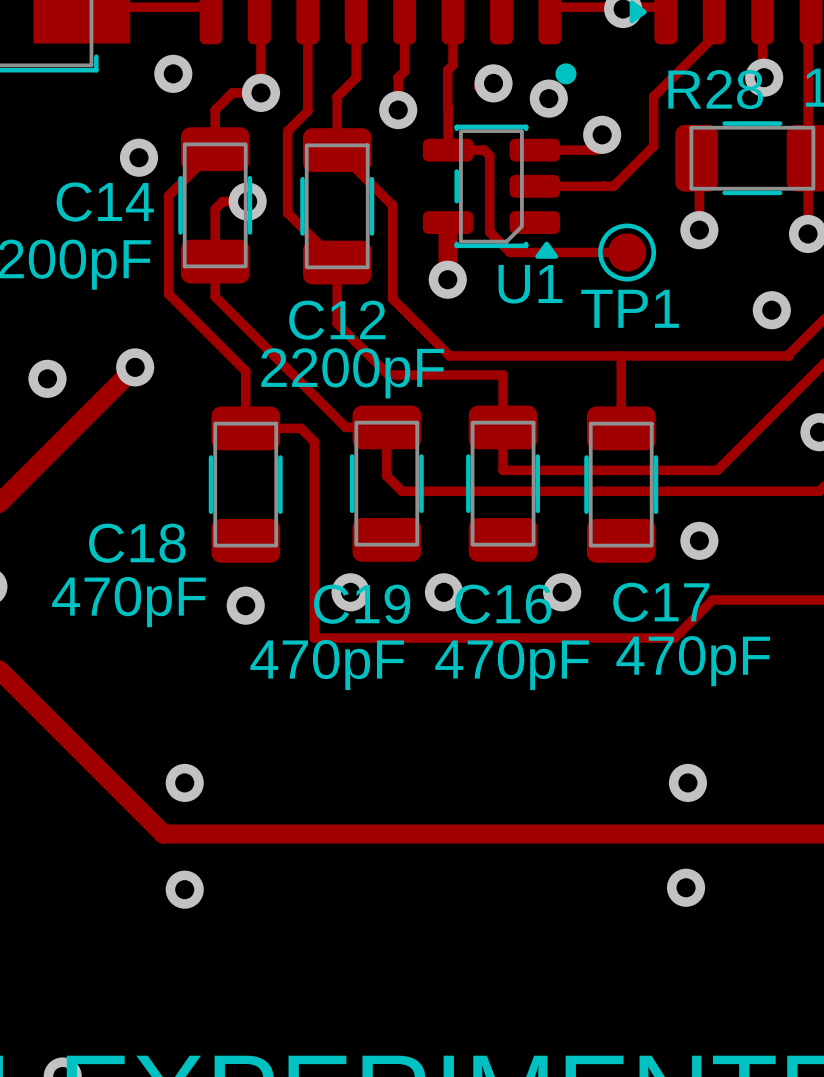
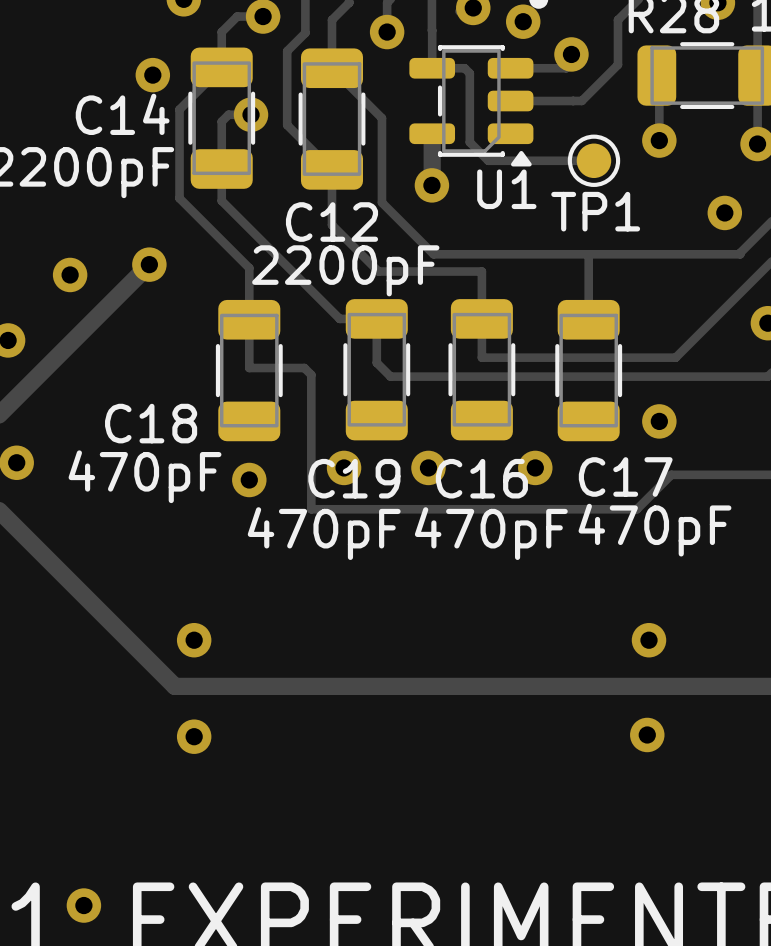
track: (245, 428) (301, 428) (314, 441) (314, 489) -> (249, 319) (249, 368) (304, 368) (311, 374)

